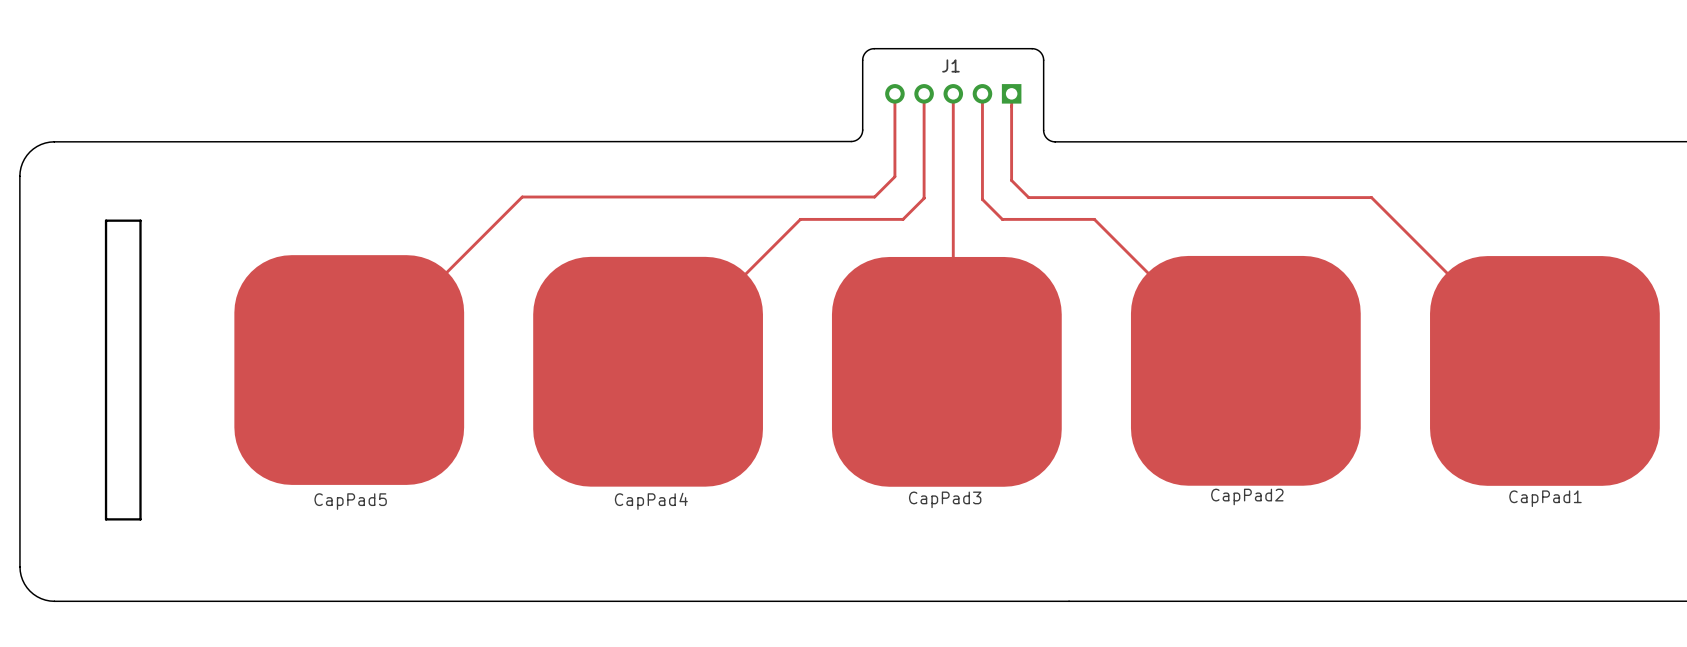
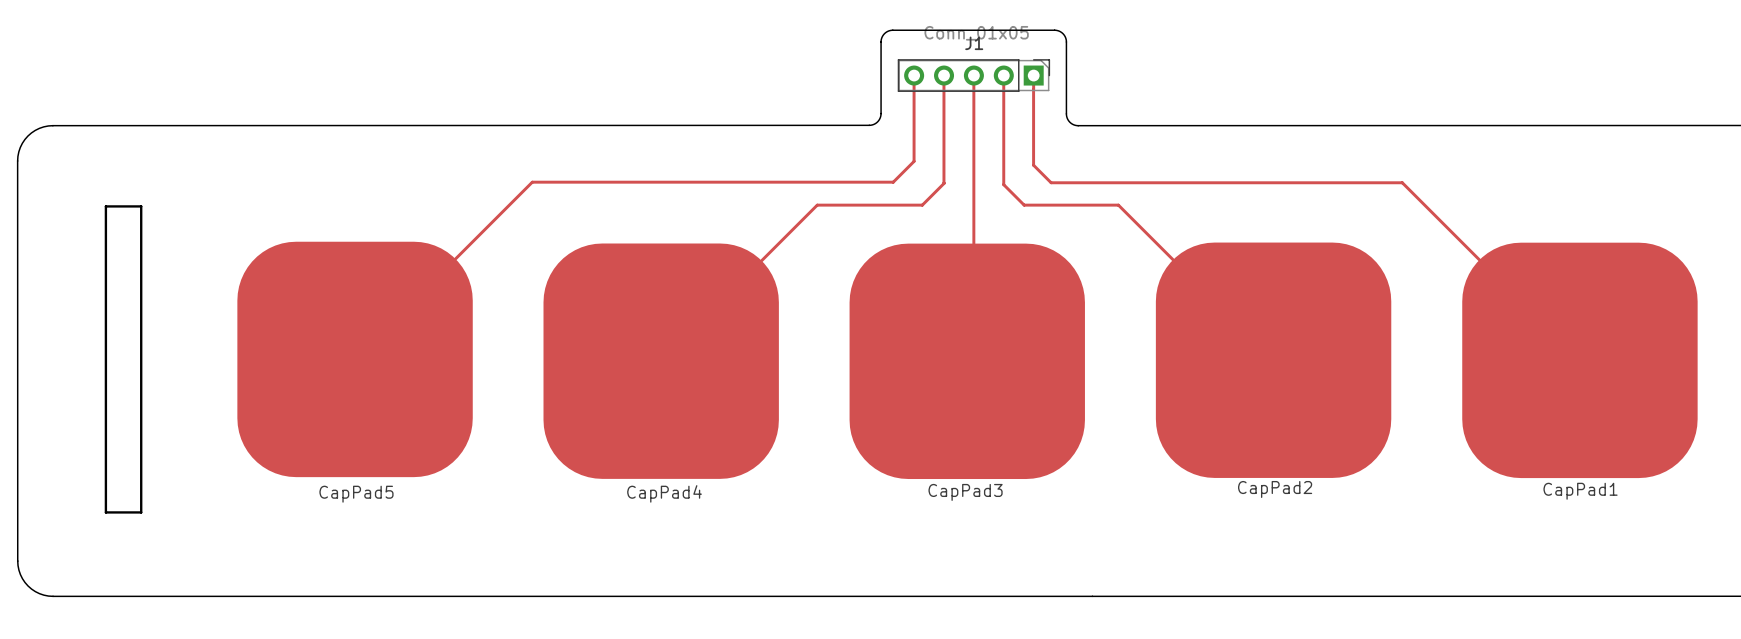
J1 side: bottom (953, 93) -> top (973, 75)

